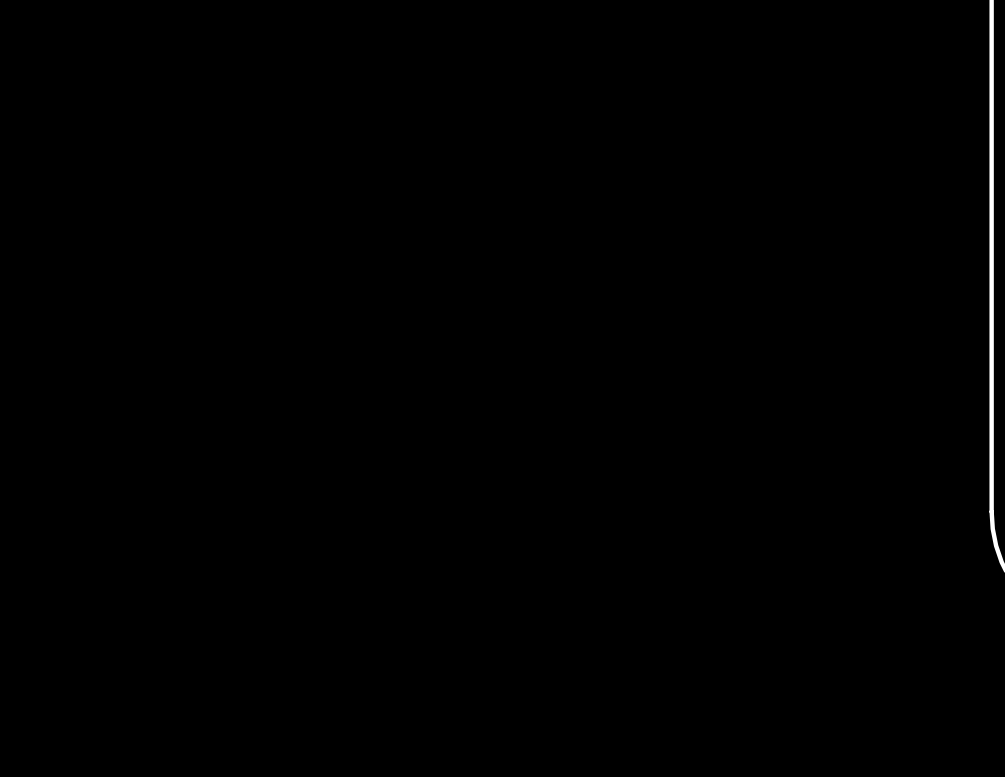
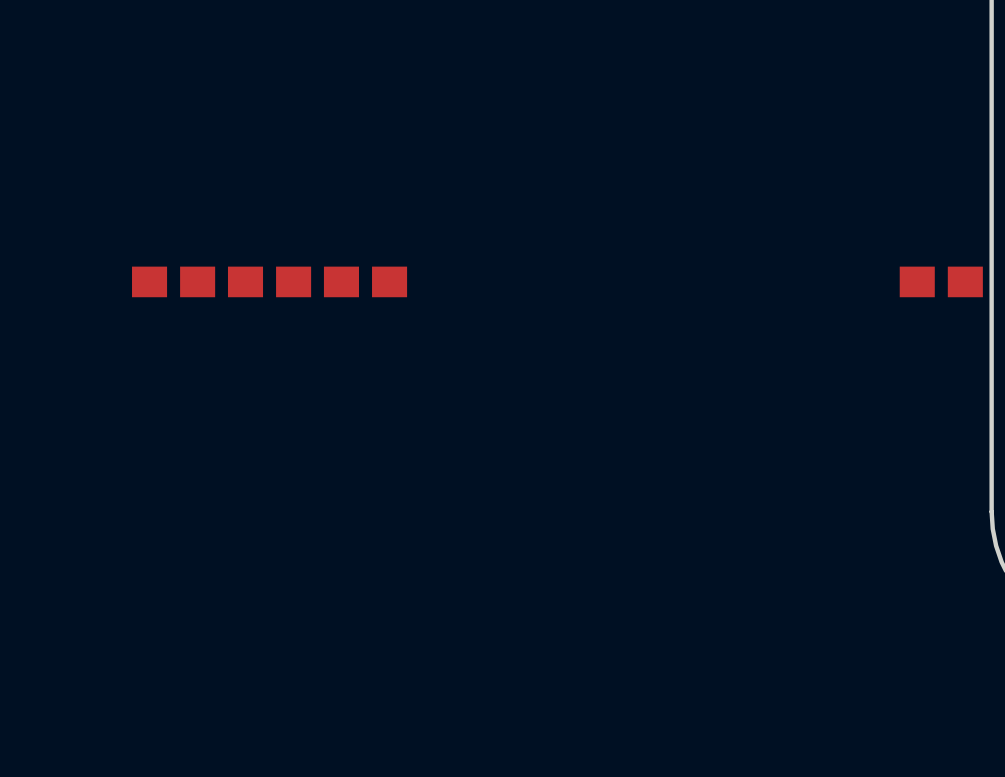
part: none -> (173, 281)
part: none -> (269, 281)
part: none -> (365, 281)
part: none -> (941, 281)

